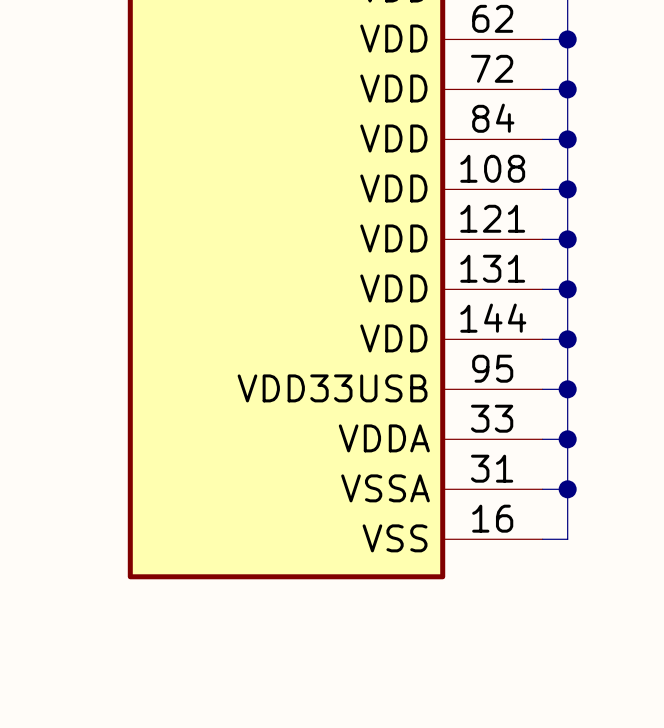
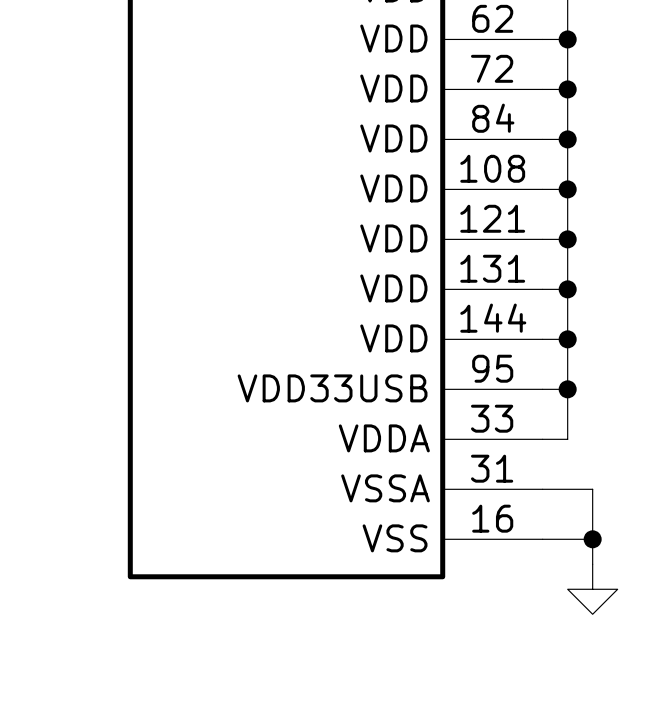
wire: (567, 439) (567, 539) -> (592, 539) (567, 539)
junction: (567, 439) -> none
wire: none -> (567, 489) (592, 489) (592, 564)
junction: (567, 489) -> none
junction: none -> (592, 539)
power symbol: none -> (592, 589)

